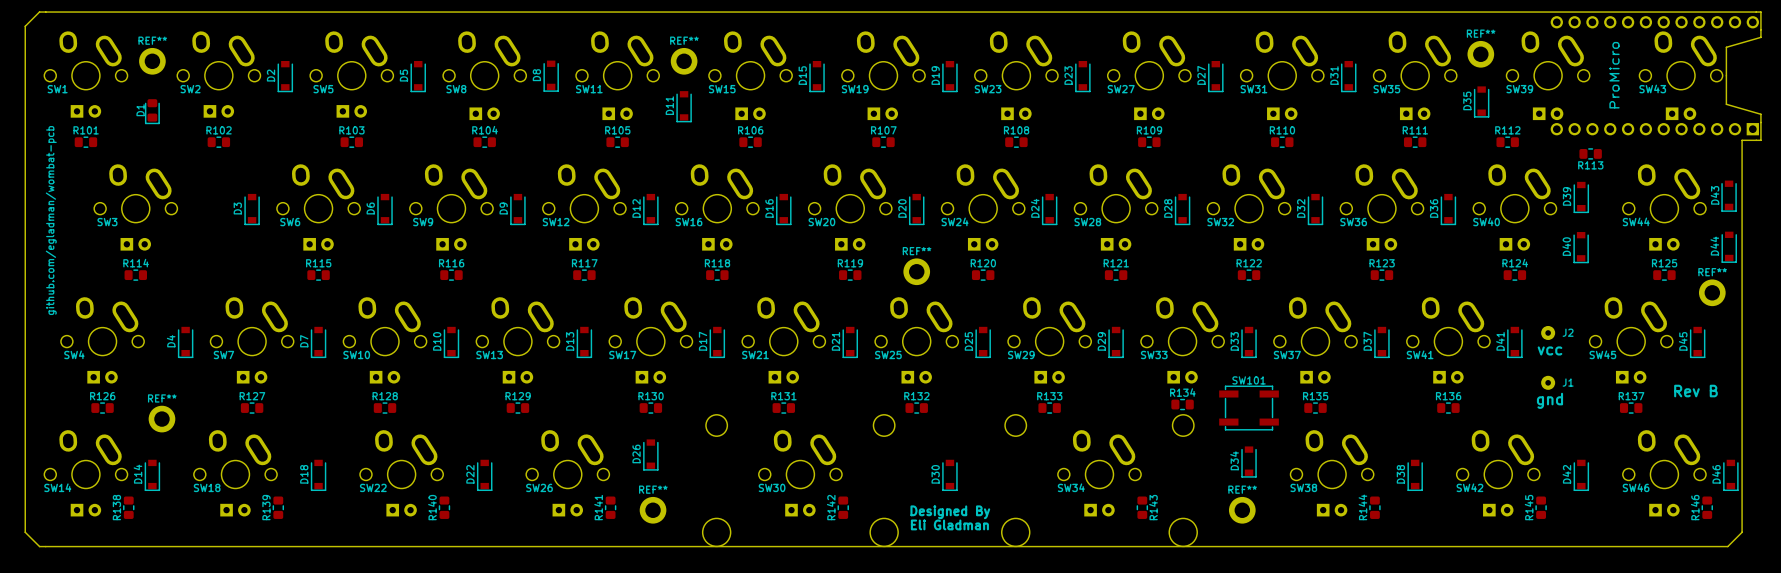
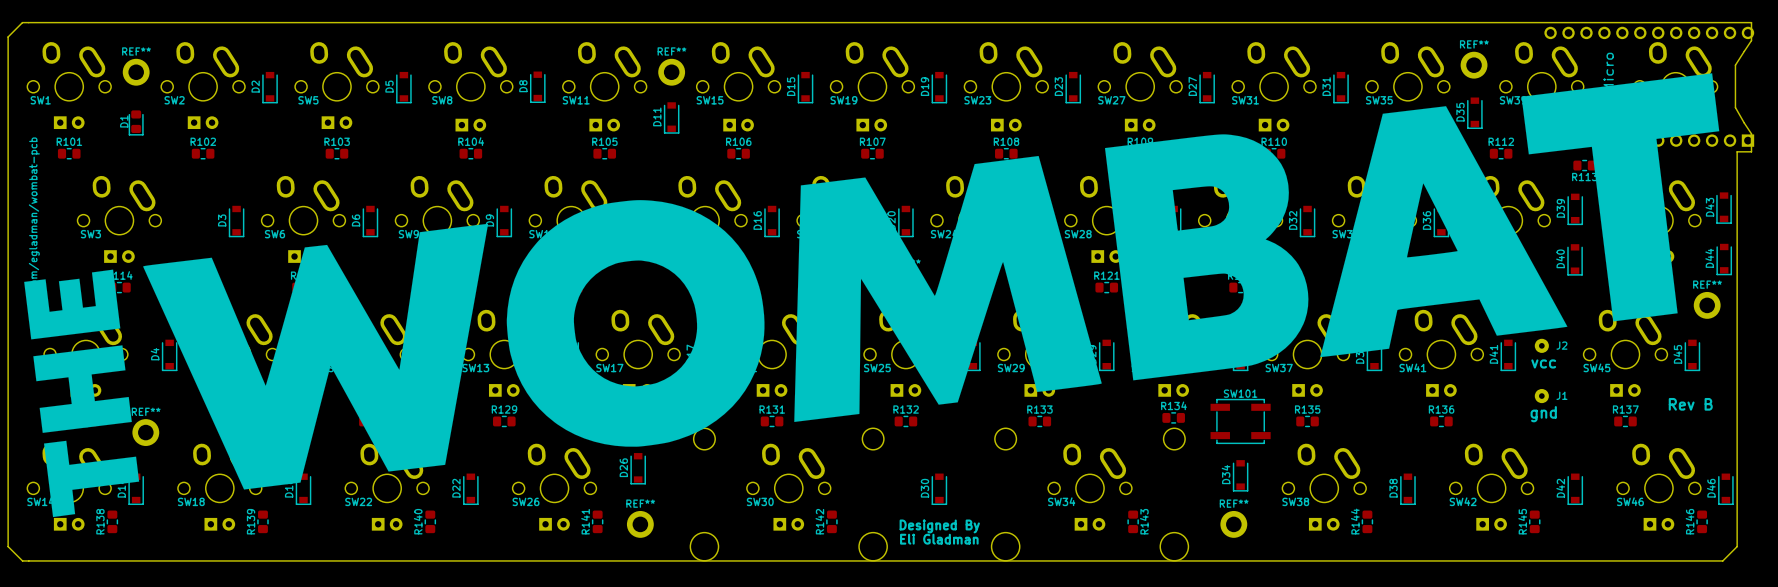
board edge: (1756, 12) (1760, 12) (1760, 37) (1726, 47) (1726, 104) (1760, 114) (1760, 140) (1756, 140) -> (1751, 22) (1751, 40) (1735, 65) (1735, 107) (1751, 133) (1751, 151)
drawing: none -> [24, 73, 1720, 518]

